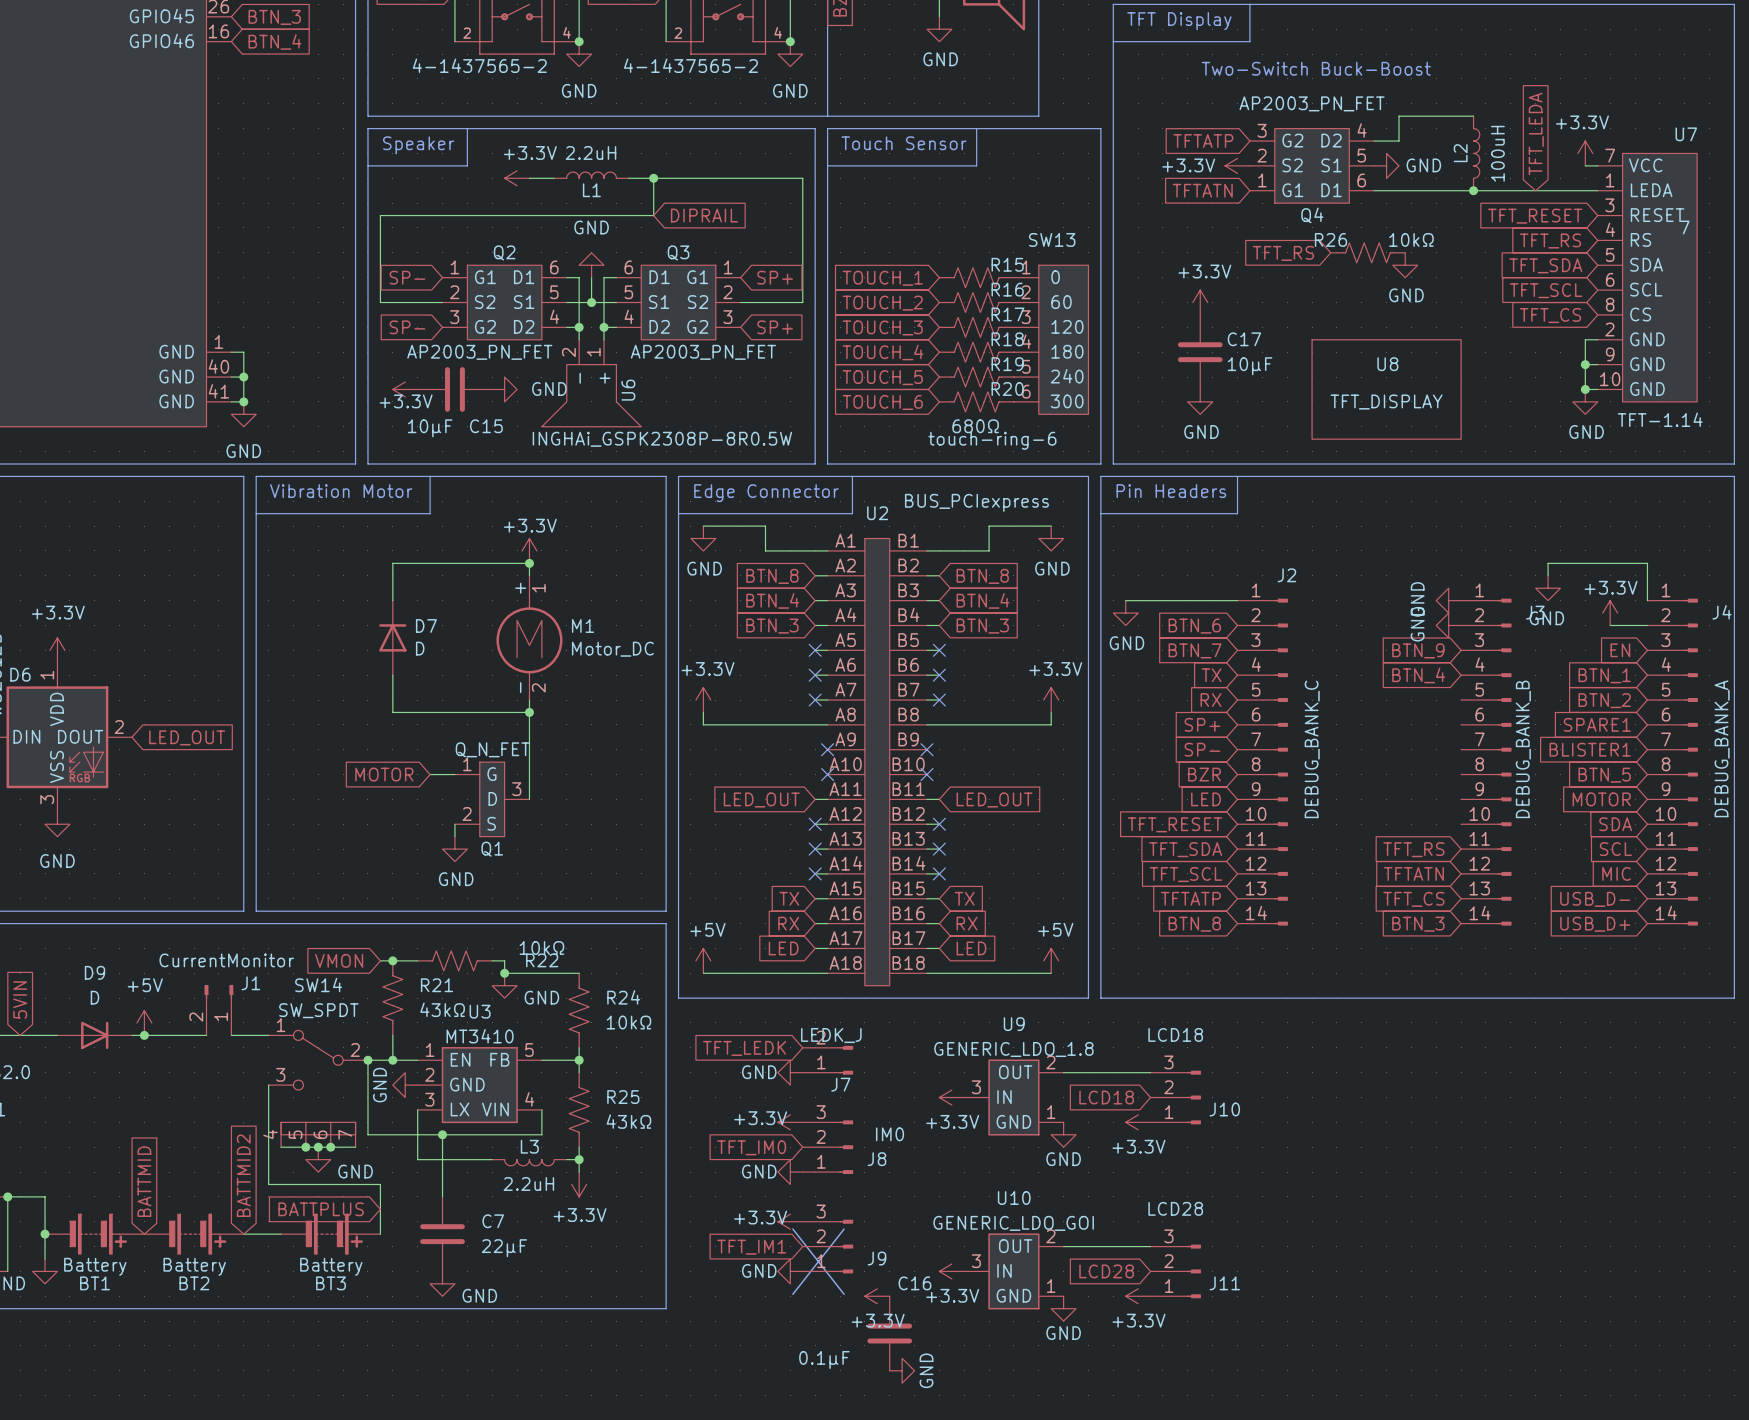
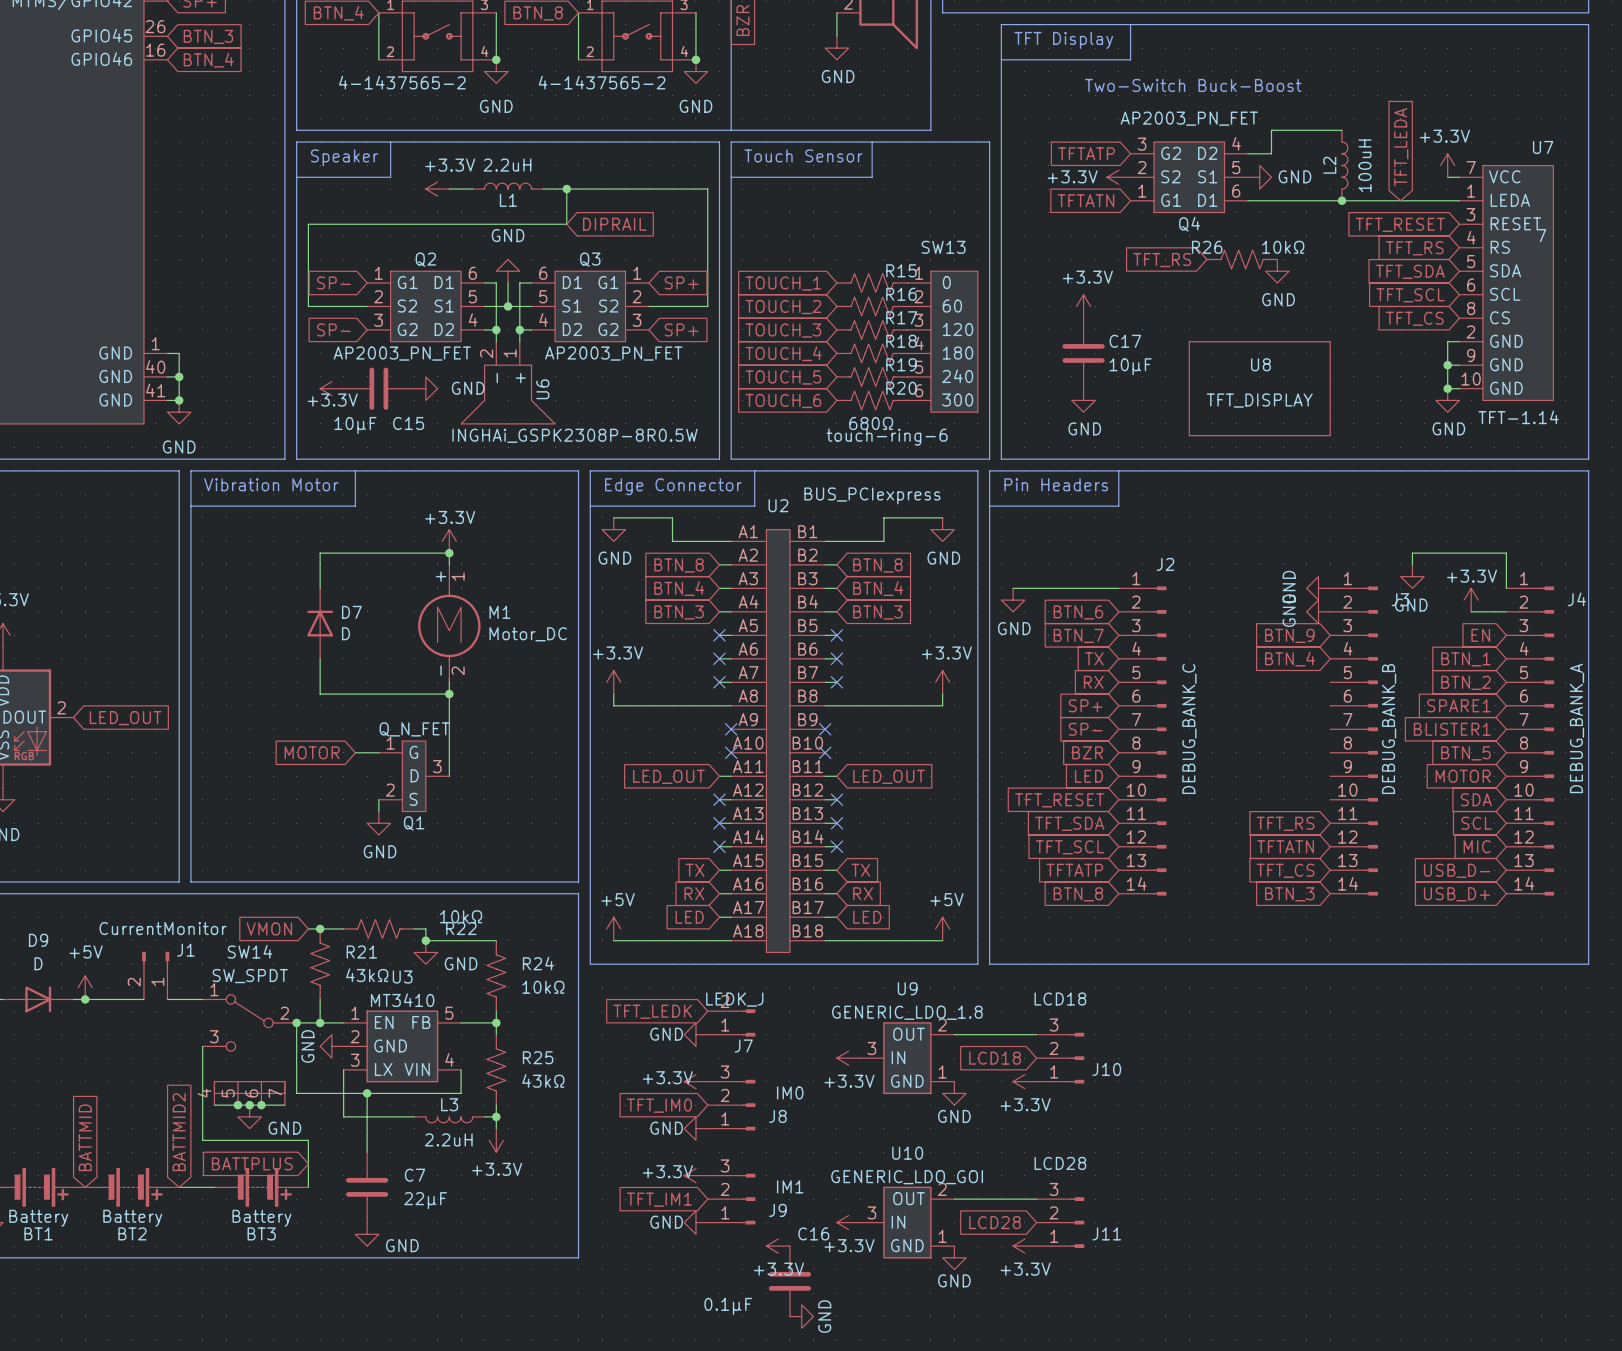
J9 value: none -> IM1 (790, 1186)
text: x (818, 1261) -> none

